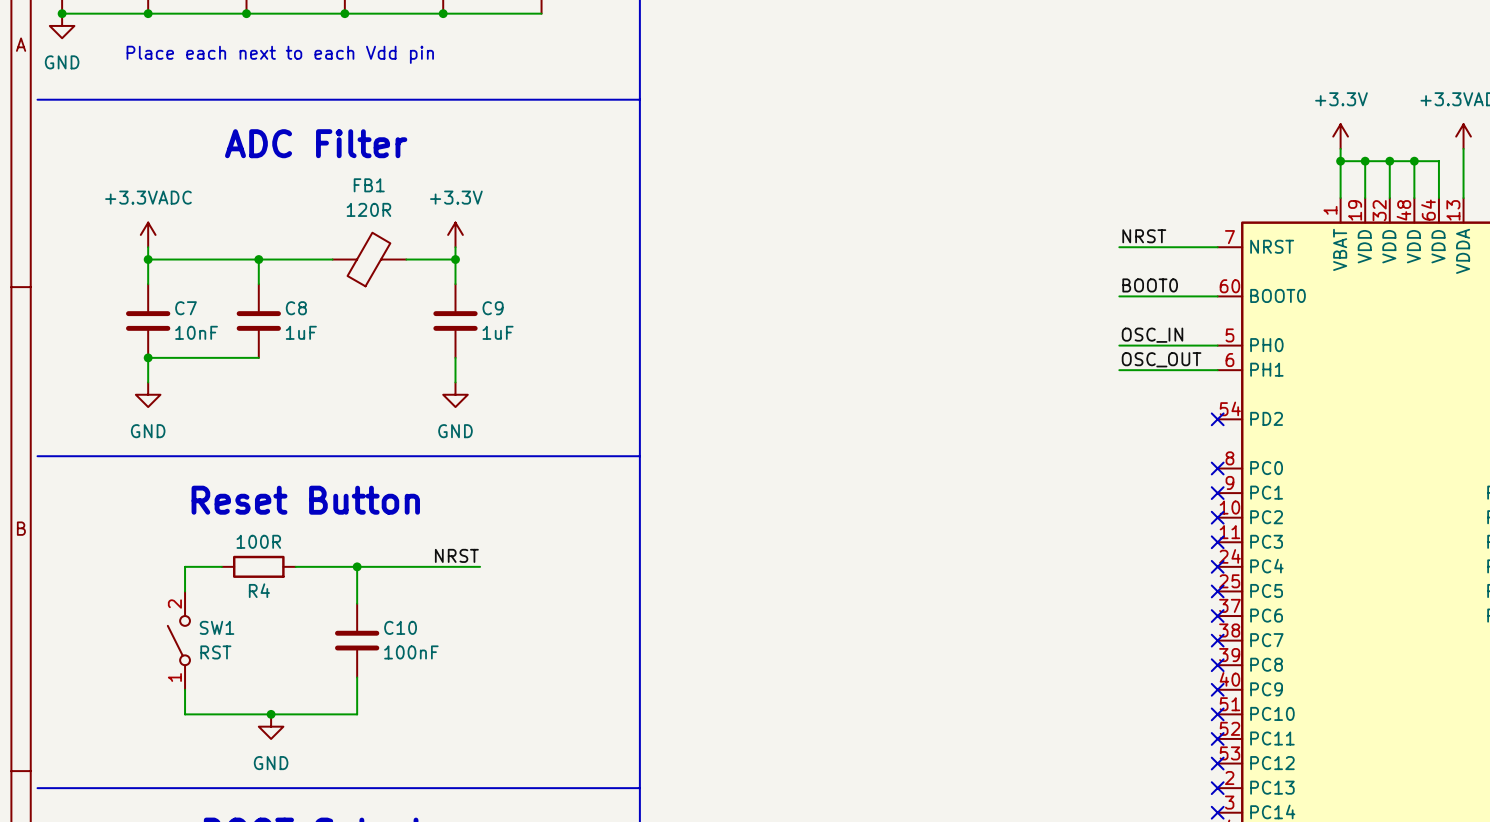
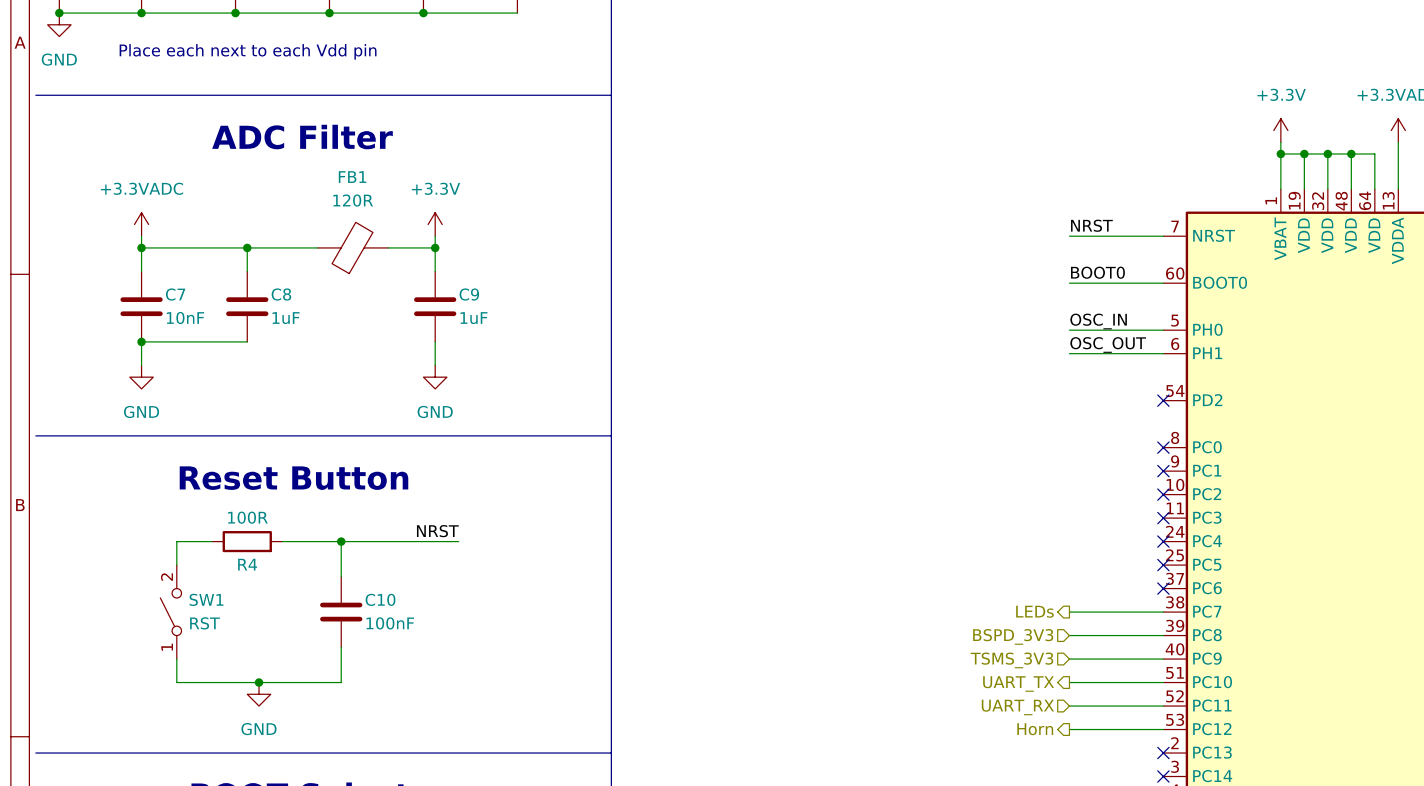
hierarchical label: none -> LEDs (1034, 611)
wire: none -> (1069, 612) (1163, 612)
no-connect mark: (1217, 640) -> none
hierarchical label: none -> BSPD_3V3 (1013, 636)
wire: none -> (1069, 635) (1163, 635)
no-connect mark: (1217, 665) -> none
hierarchical label: none -> TSMS_3V3 (1011, 660)
wire: none -> (1069, 659) (1163, 659)
no-connect mark: (1217, 689) -> none
hierarchical label: none -> UART_TX (1018, 684)
wire: none -> (1069, 682) (1163, 682)
no-connect mark: (1217, 714) -> none
wire: none -> (1069, 706) (1163, 706)
no-connect mark: (1217, 738) -> none
hierarchical label: none -> UART_RX (1017, 707)
hierarchical label: none -> Horn (1035, 729)
wire: none -> (1069, 729) (1163, 729)
no-connect mark: (1217, 763) -> none

